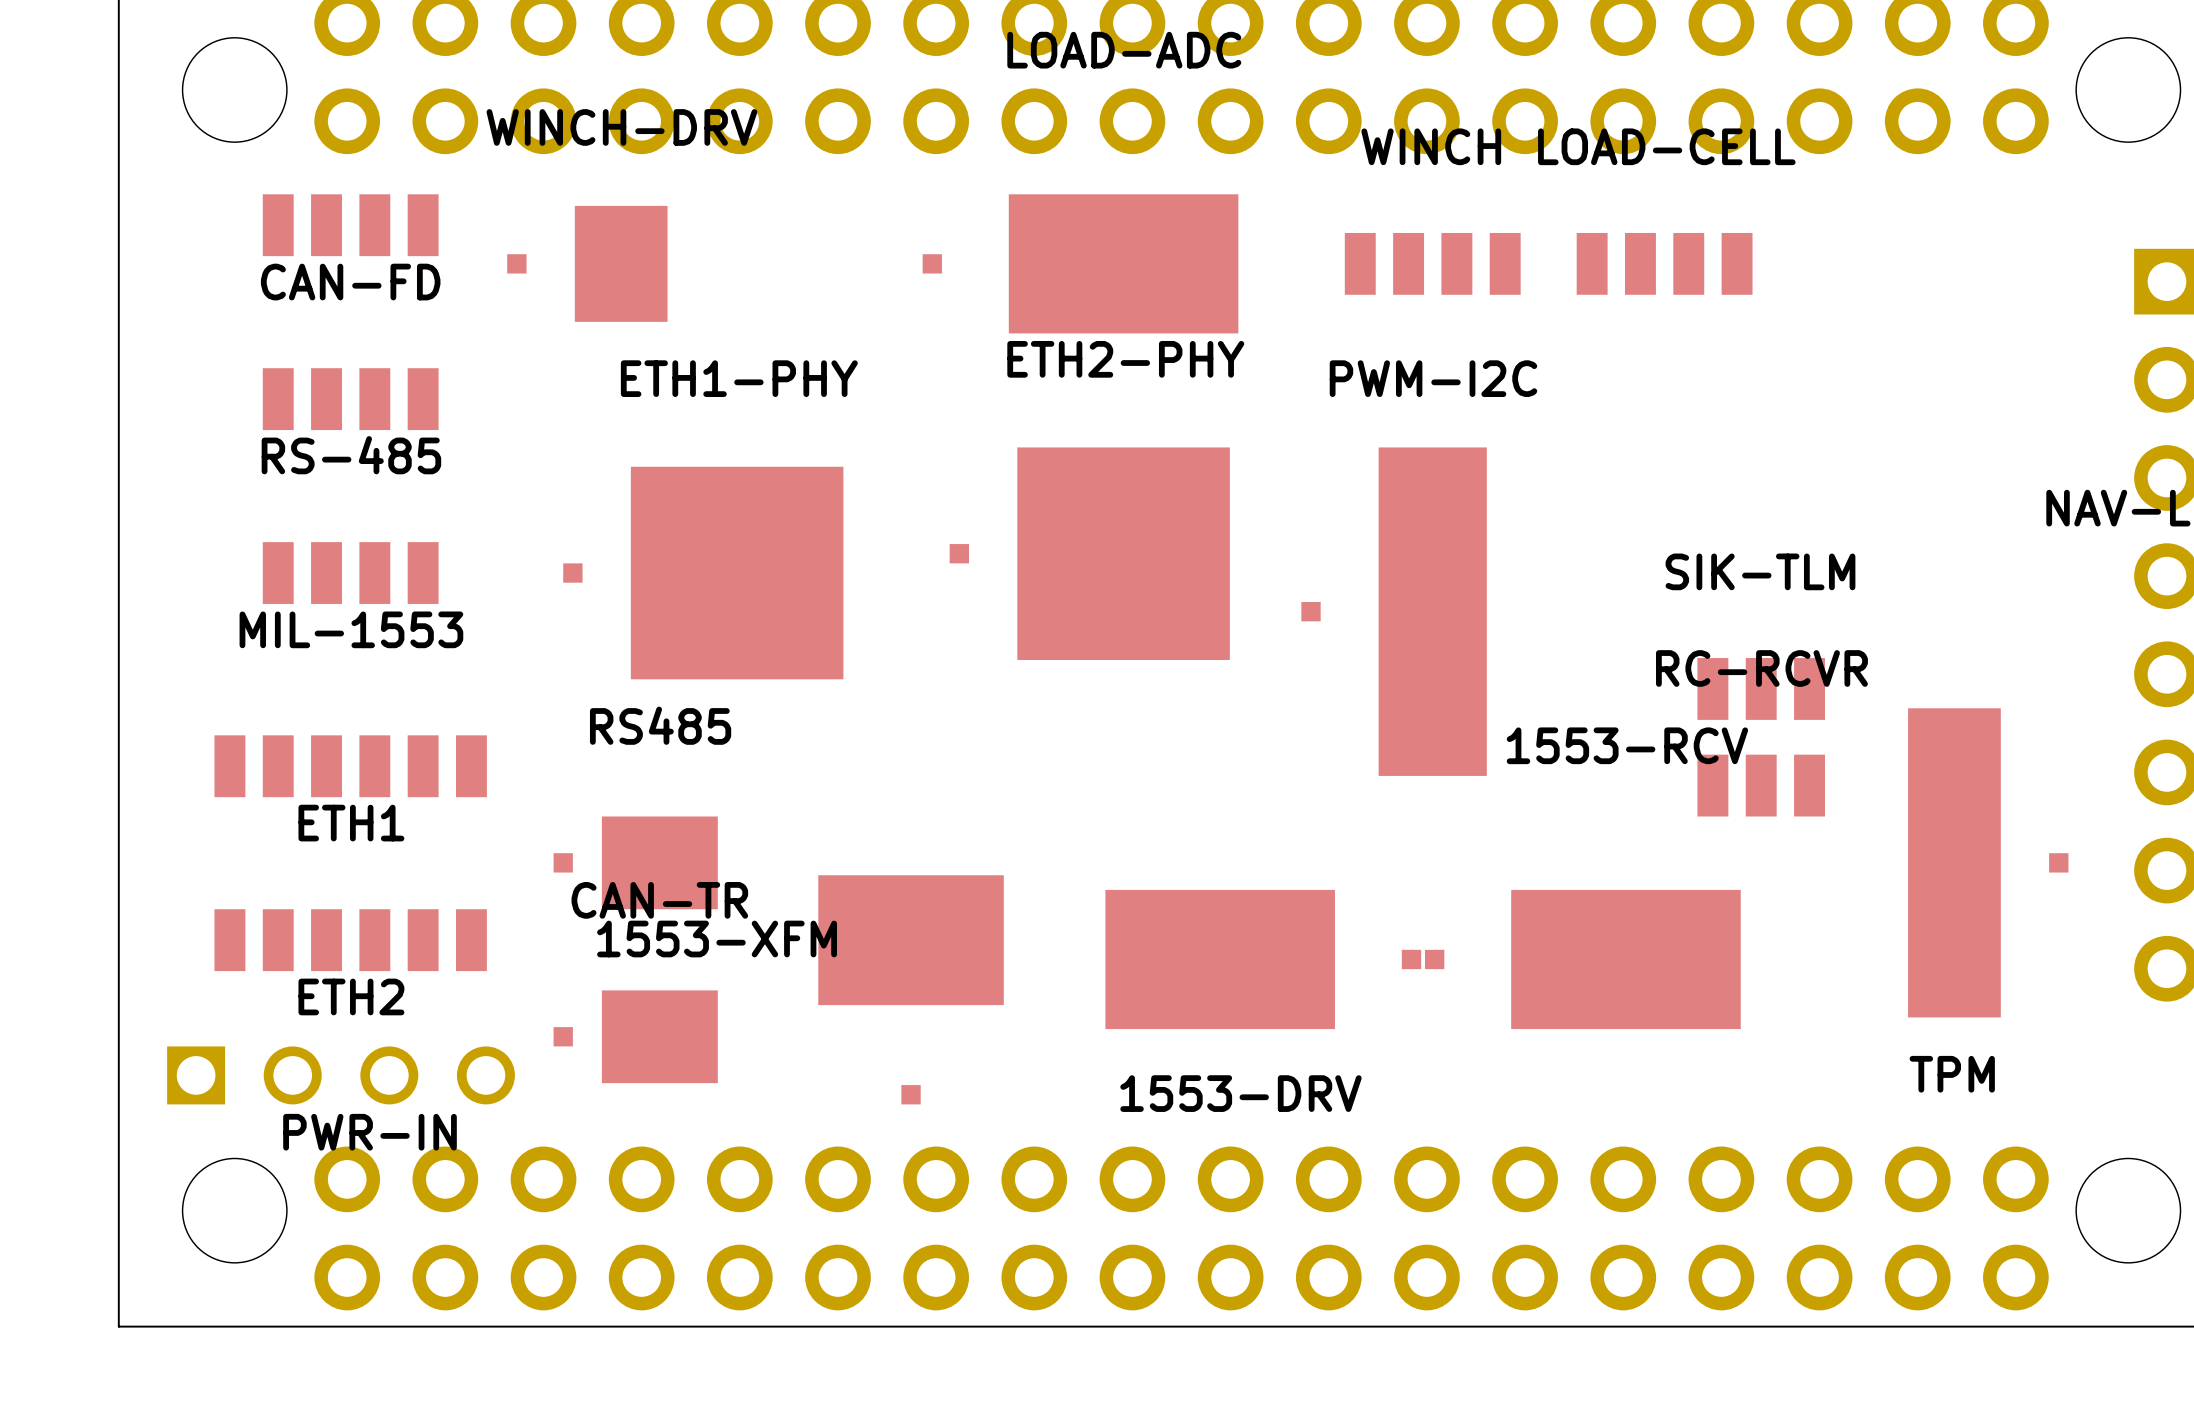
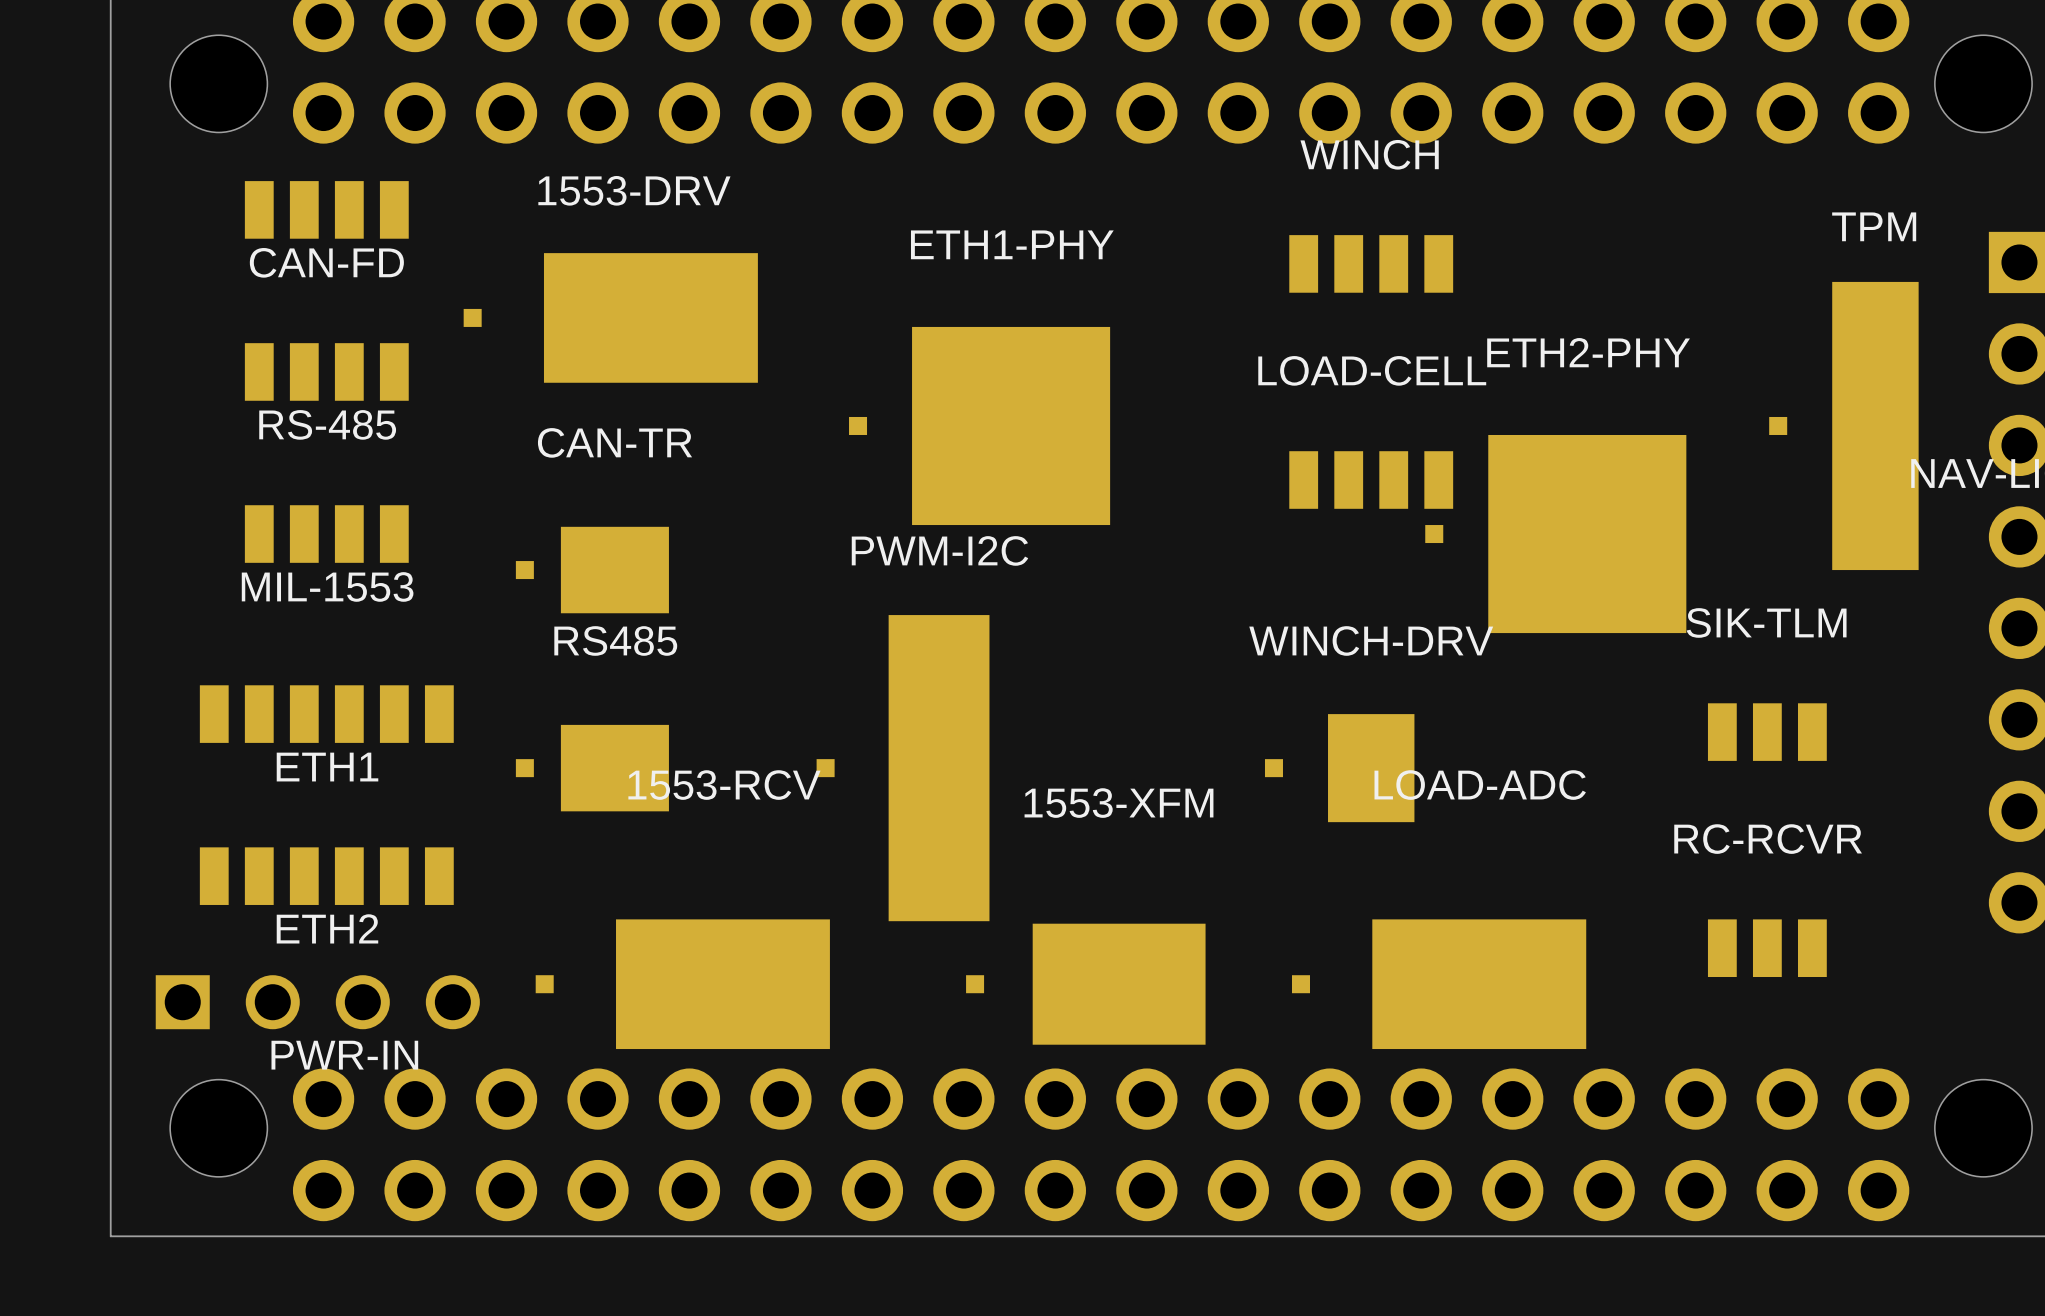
WINCH-DRV: (587, 263) -> none
LOAD-ADC position: (1080, 263) -> (1439, 984)
WINCH position: (1432, 263) -> (1371, 263)
LOAD-CELL position: (1664, 263) -> (1371, 480)
ETH2-PHY position: (1089, 553) -> (1555, 534)
ETH1-PHY position: (703, 573) -> (979, 425)
PWM-I2C position: (1394, 611) -> (903, 768)
SIK-TLM position: (1761, 688) -> (1767, 732)
RC-RCVR position: (1761, 785) -> (1767, 948)
WINCH-DRV: none -> (1339, 768)
RS485 position: (635, 862) -> (592, 768)
TPM rotation: 0° (1988, 862) -> 180° (1843, 425)
TPM position: (1988, 862) -> (1843, 425)
1553-XFM footprint: [818, 875, 1004, 1105] -> [966, 923, 1206, 1045]
1553-XFM name position: 1553-XFM (717, 939) -> 1553-XFM (1119, 803)
1553-DRV rotation: 0° (1263, 959) -> 180° (610, 317)
1553-DRV position: (1263, 959) -> (610, 317)
1553-RCV position: (1582, 959) -> (682, 984)
CAN-TR position: (635, 1036) -> (592, 570)

